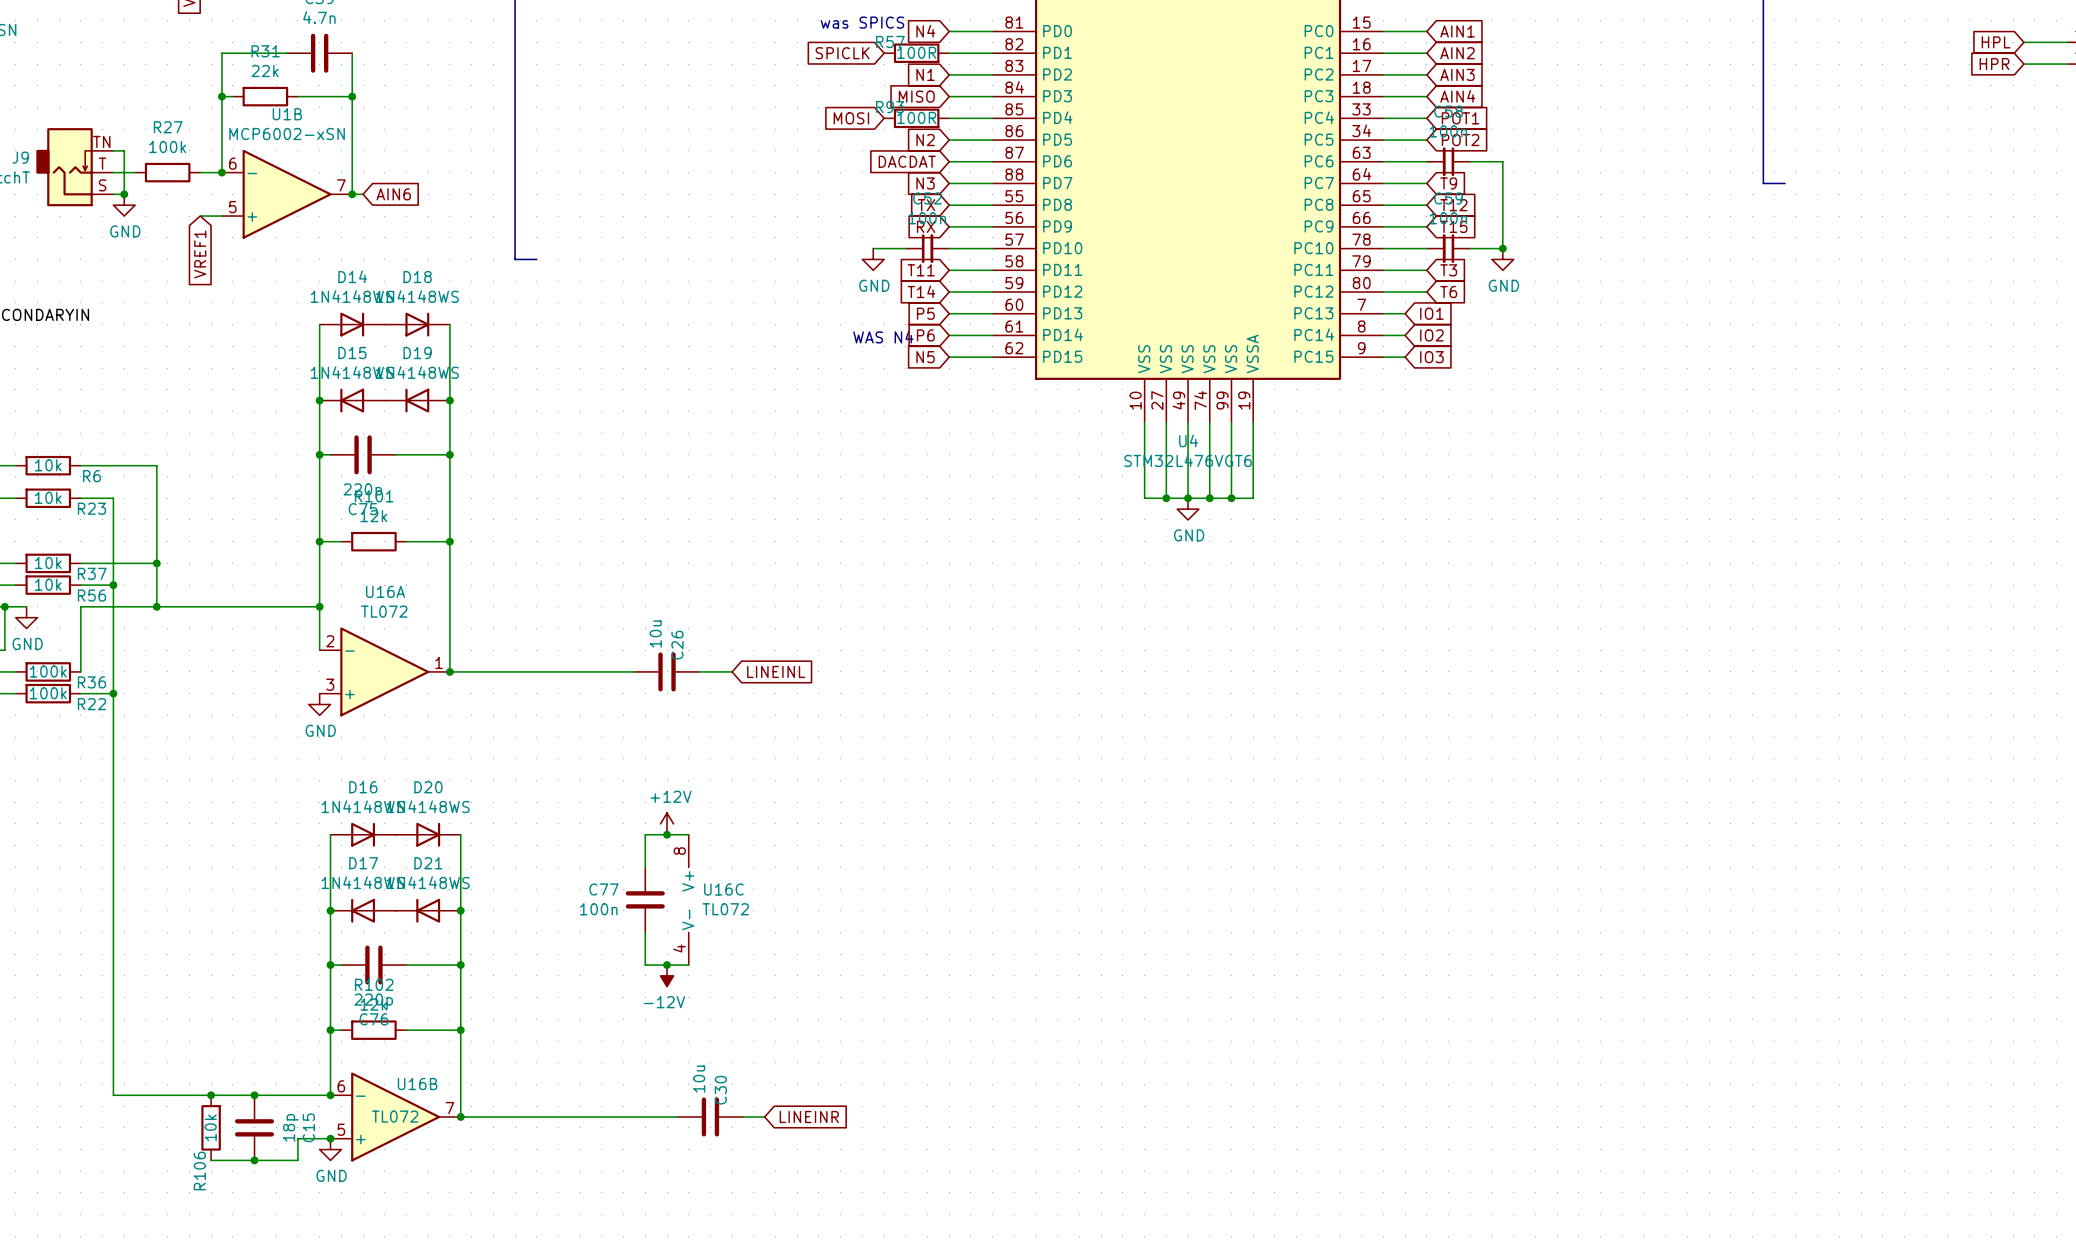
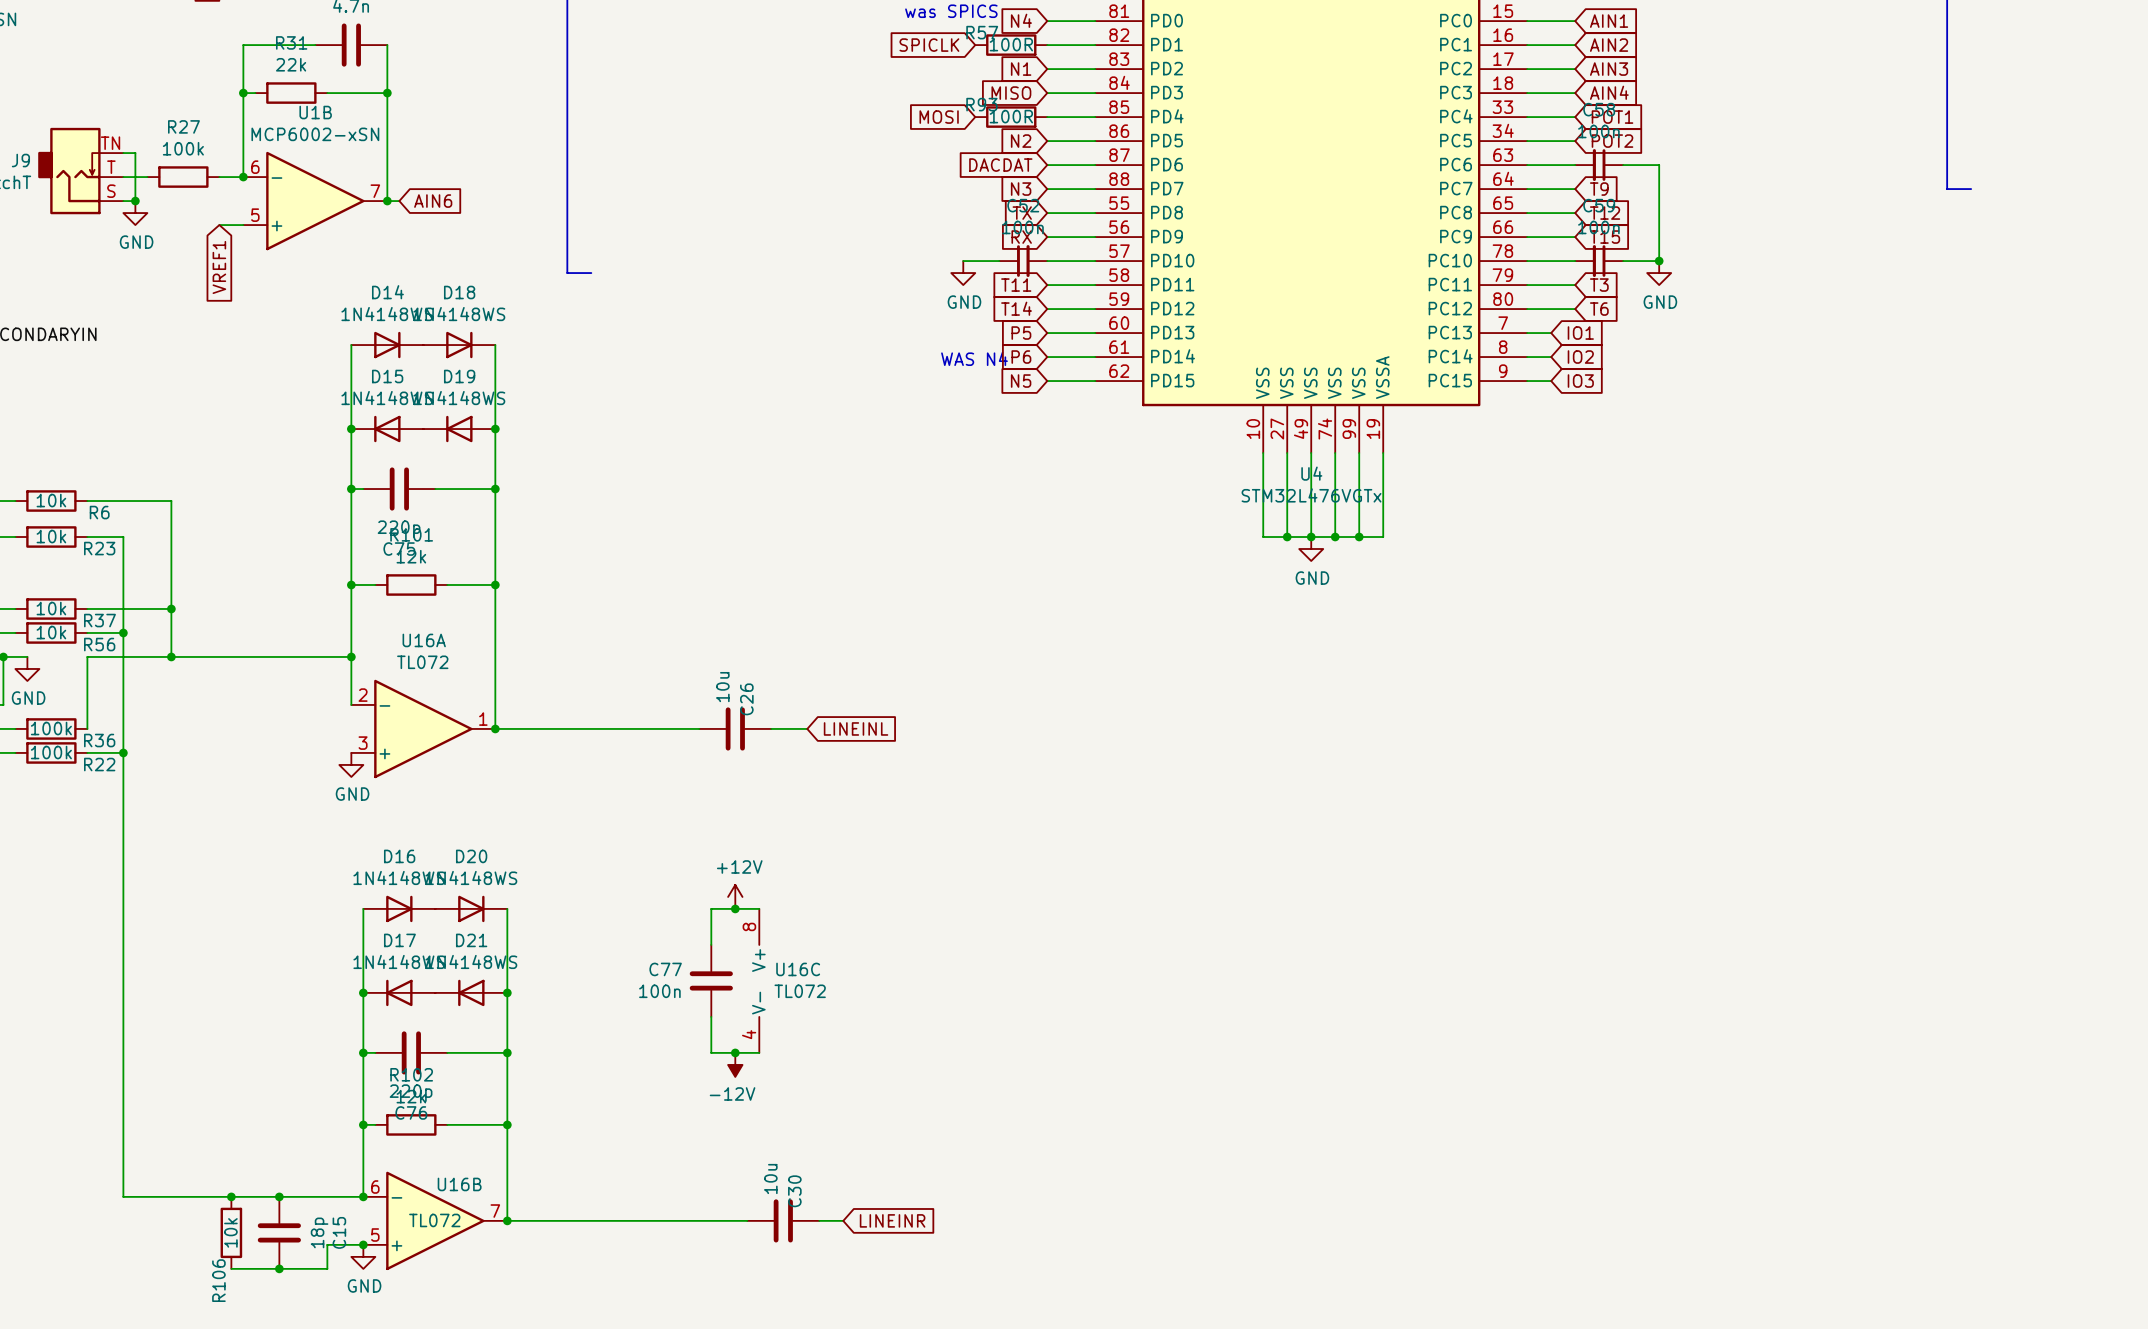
U4 value: STM32L476VGT6 (1188, 460) -> STM32L476VGTx (1311, 495)

